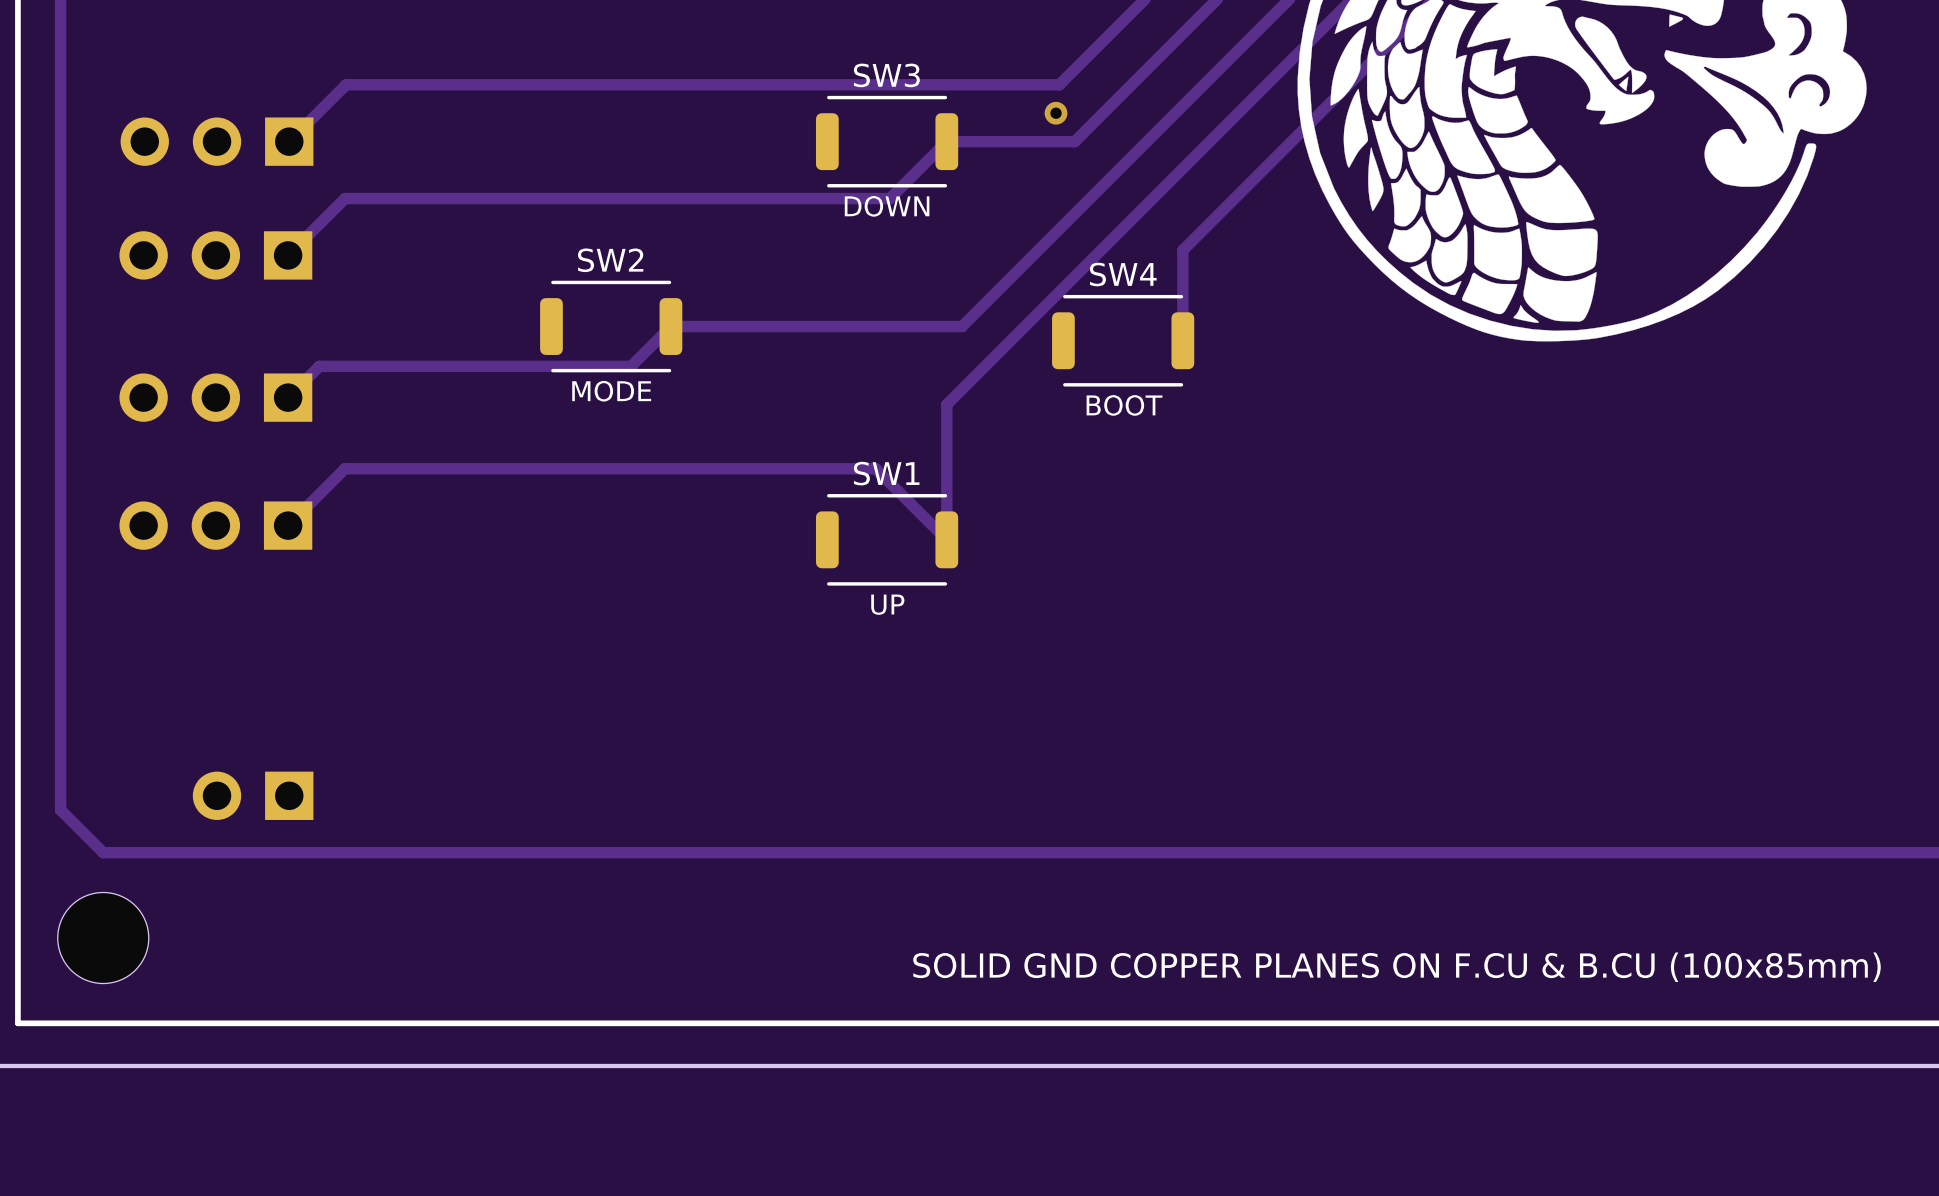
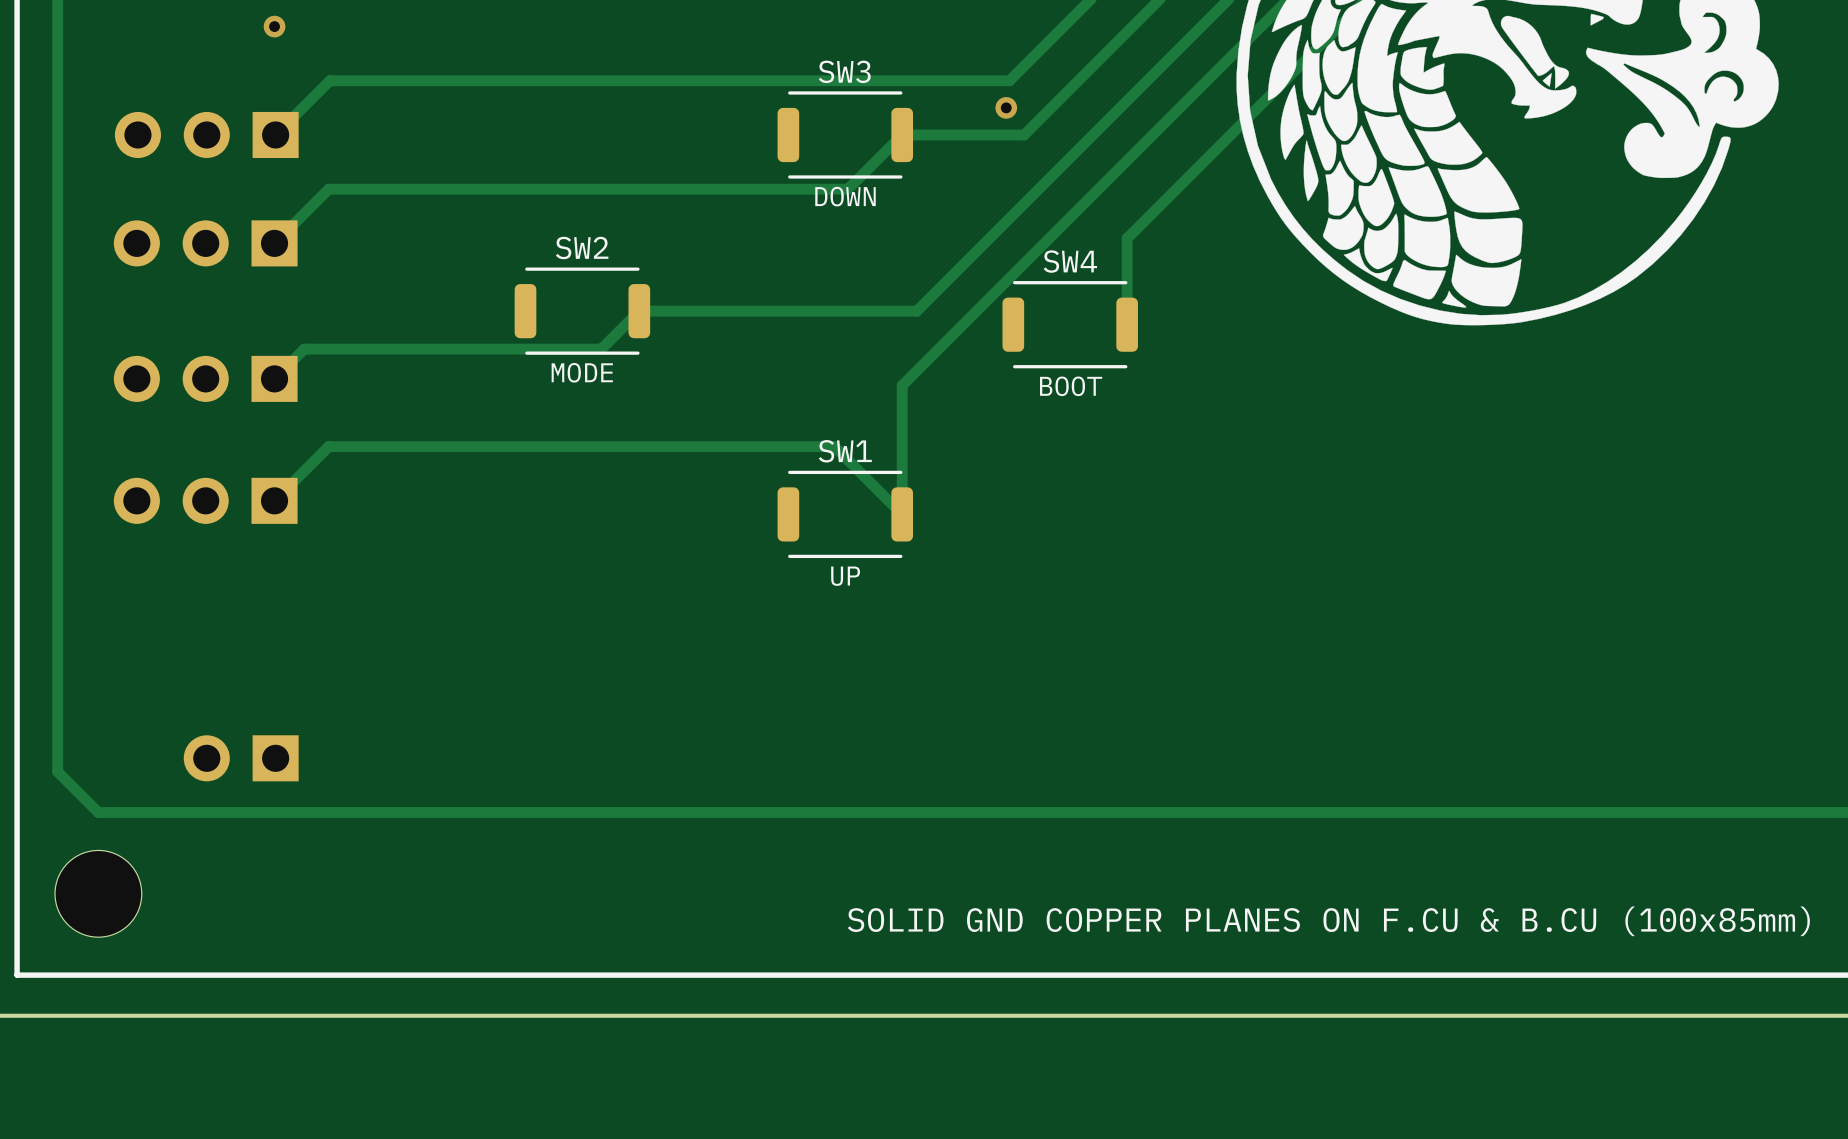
via: none -> (274, 26)

